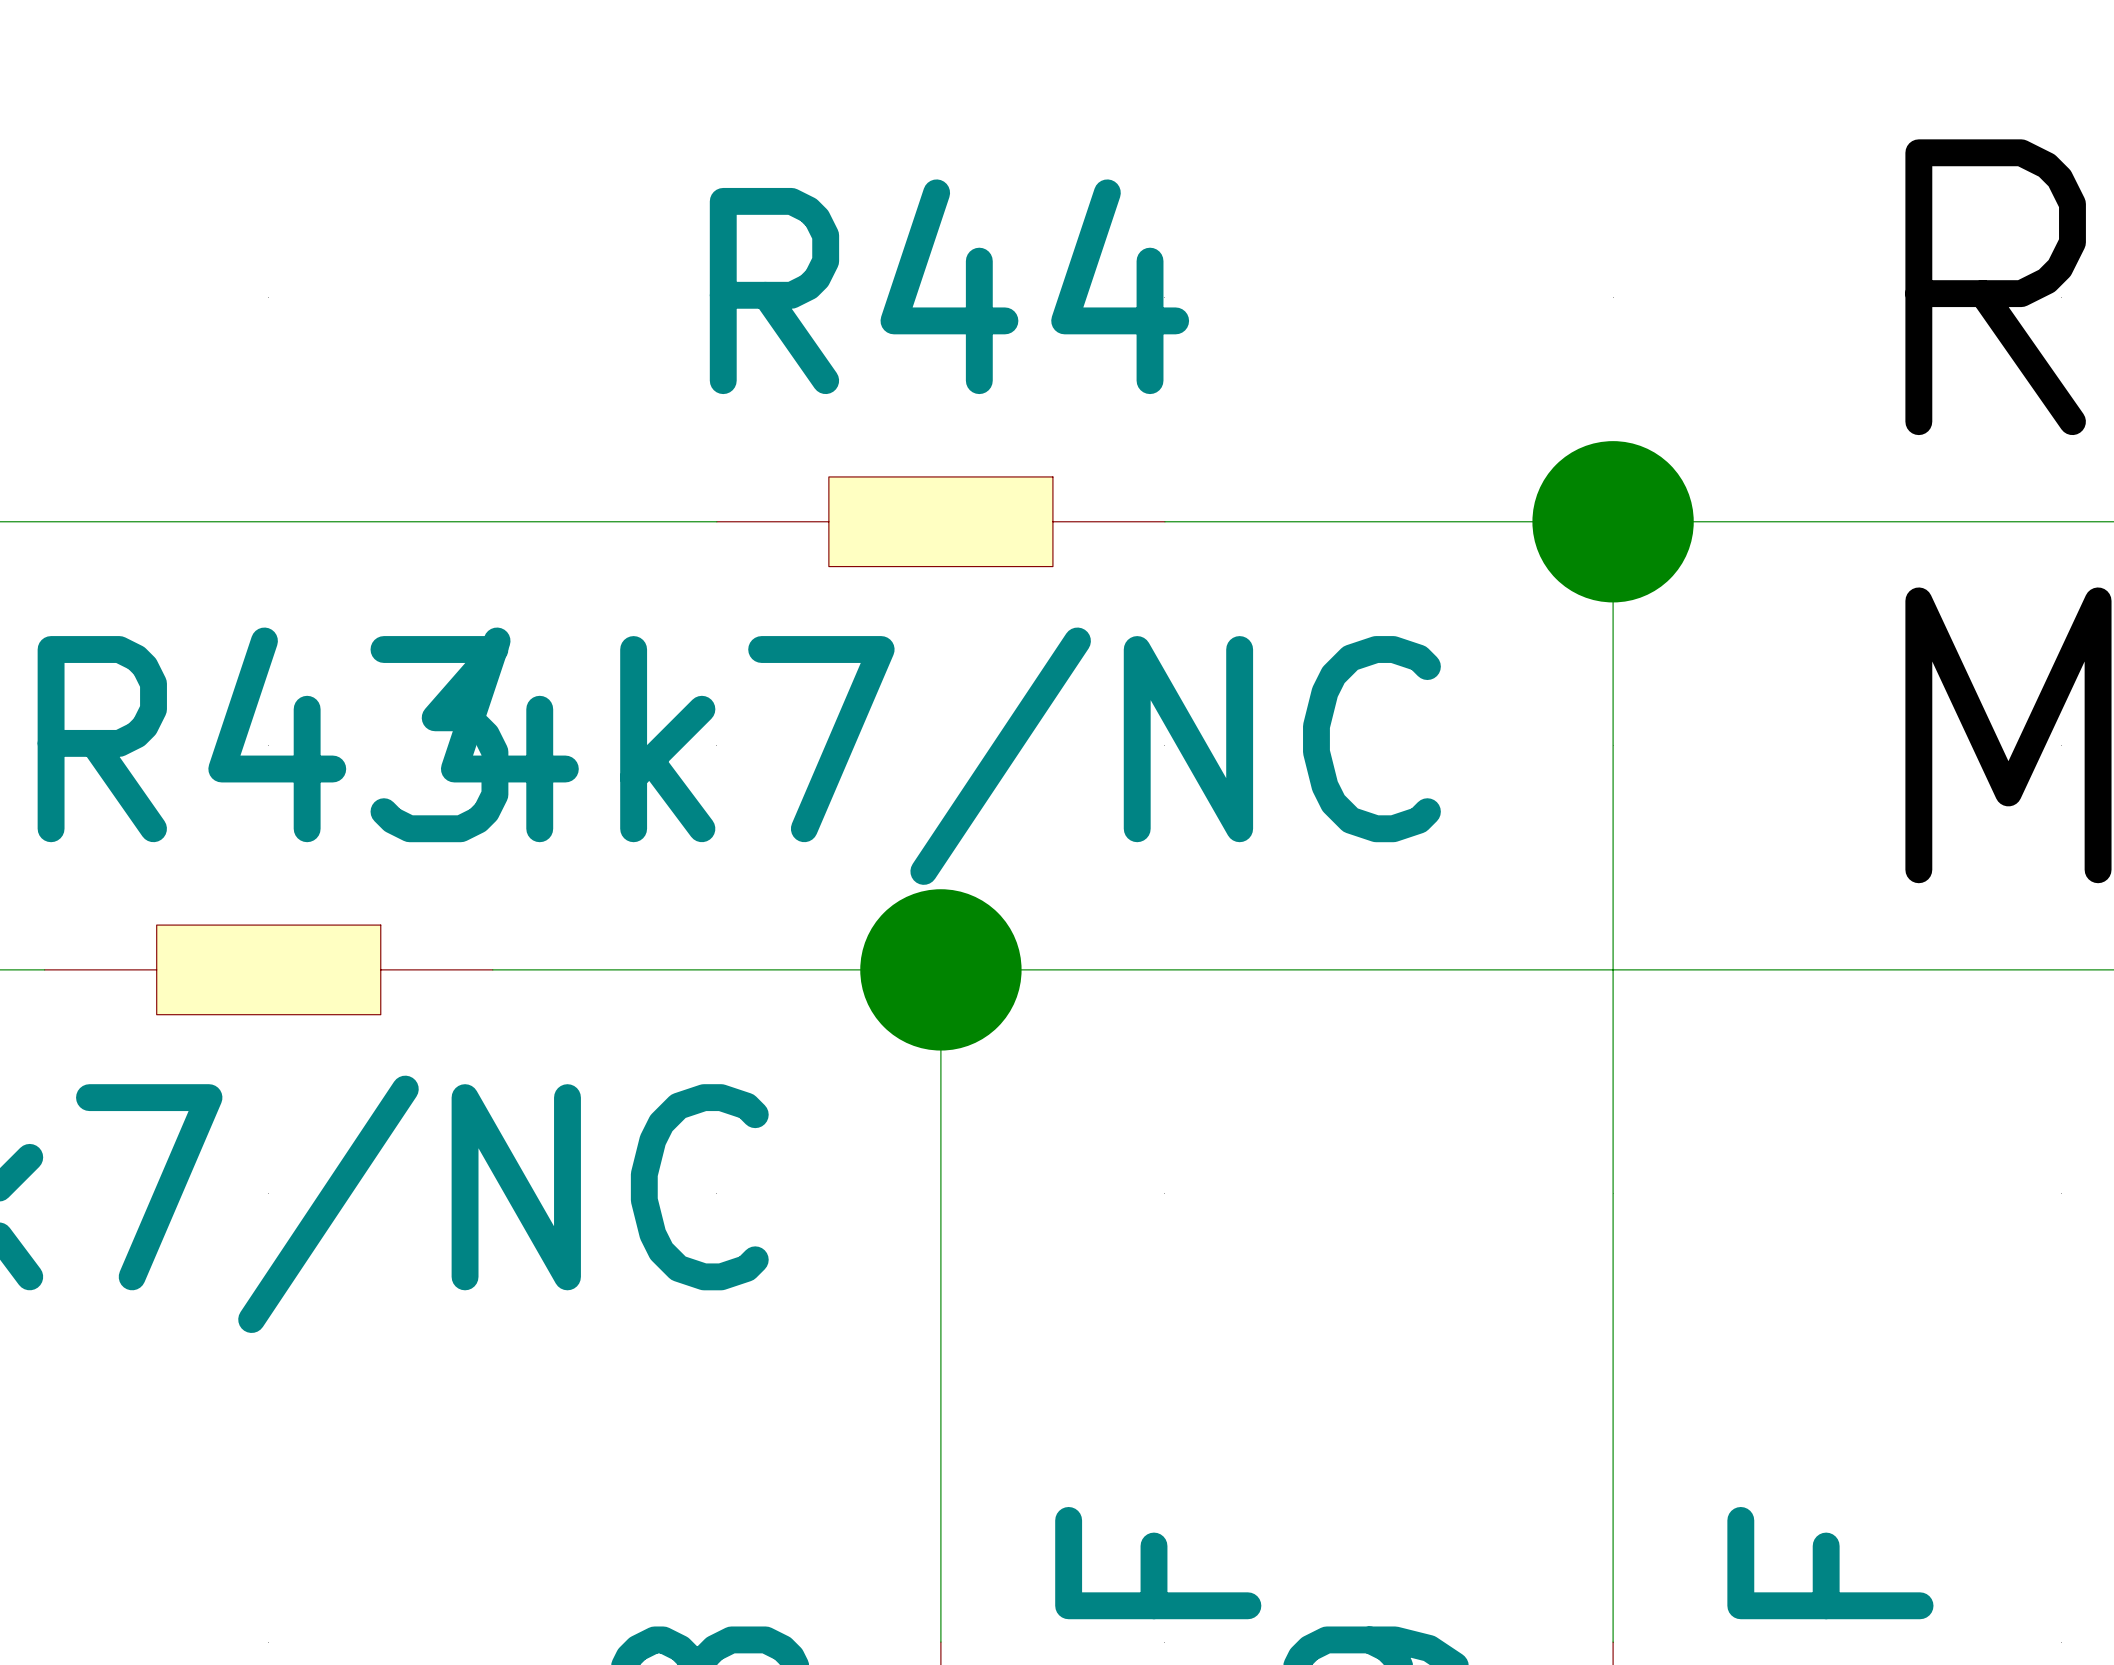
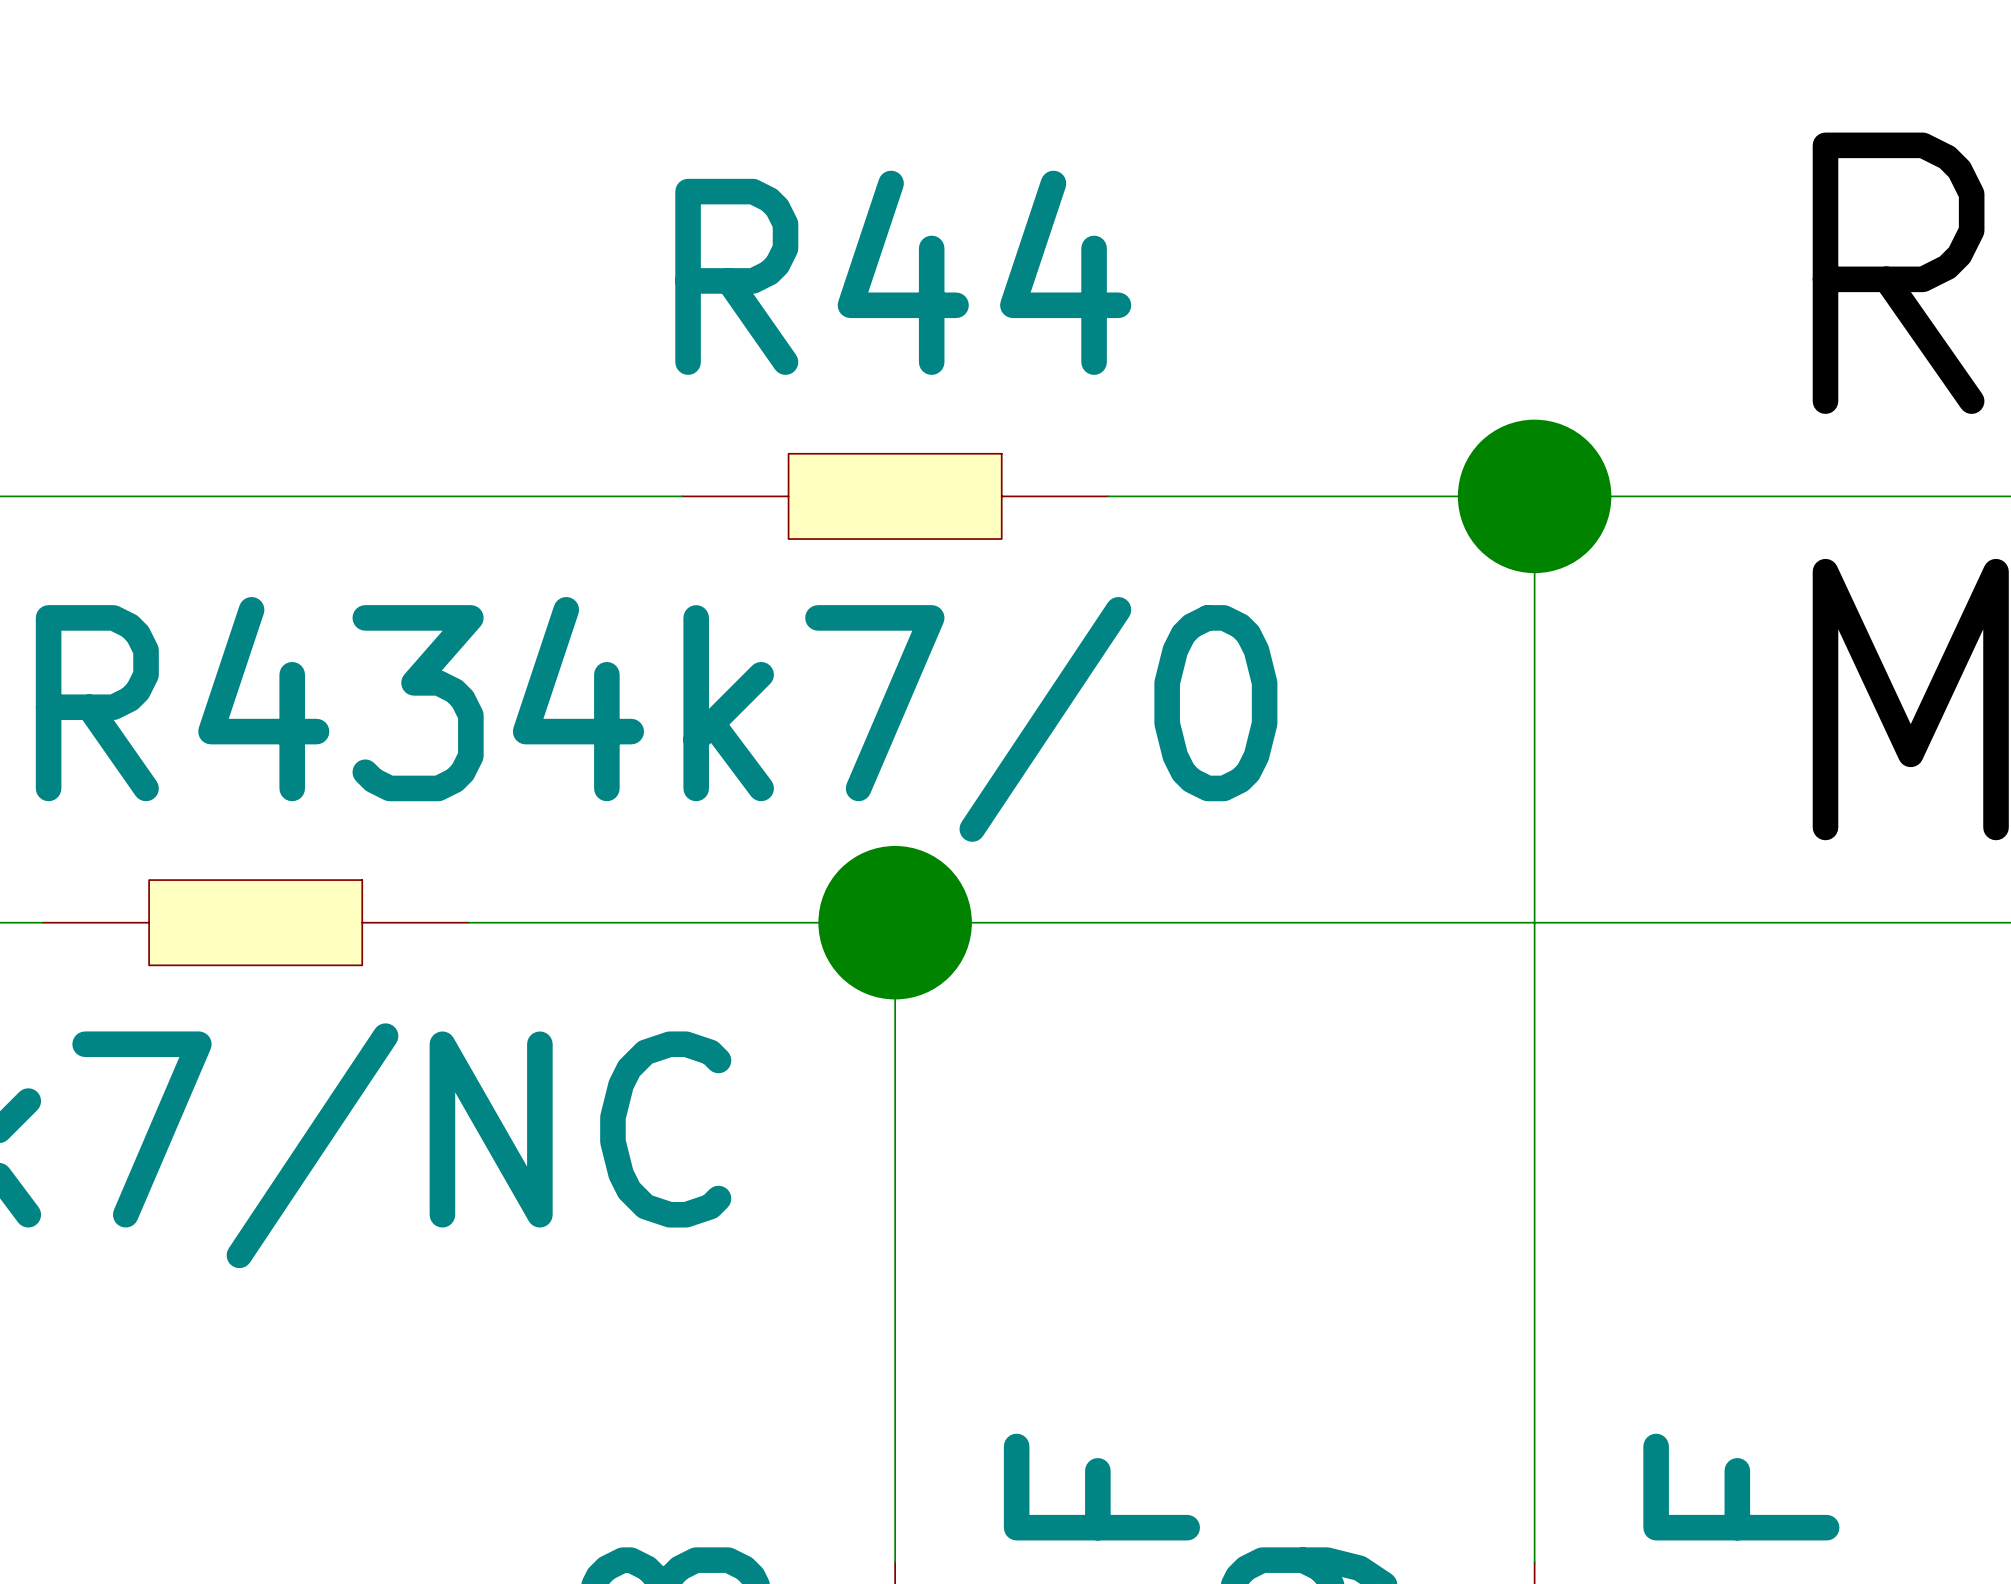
R44 value: 4k7/NC (940, 756) -> 4k7/0 (895, 719)

